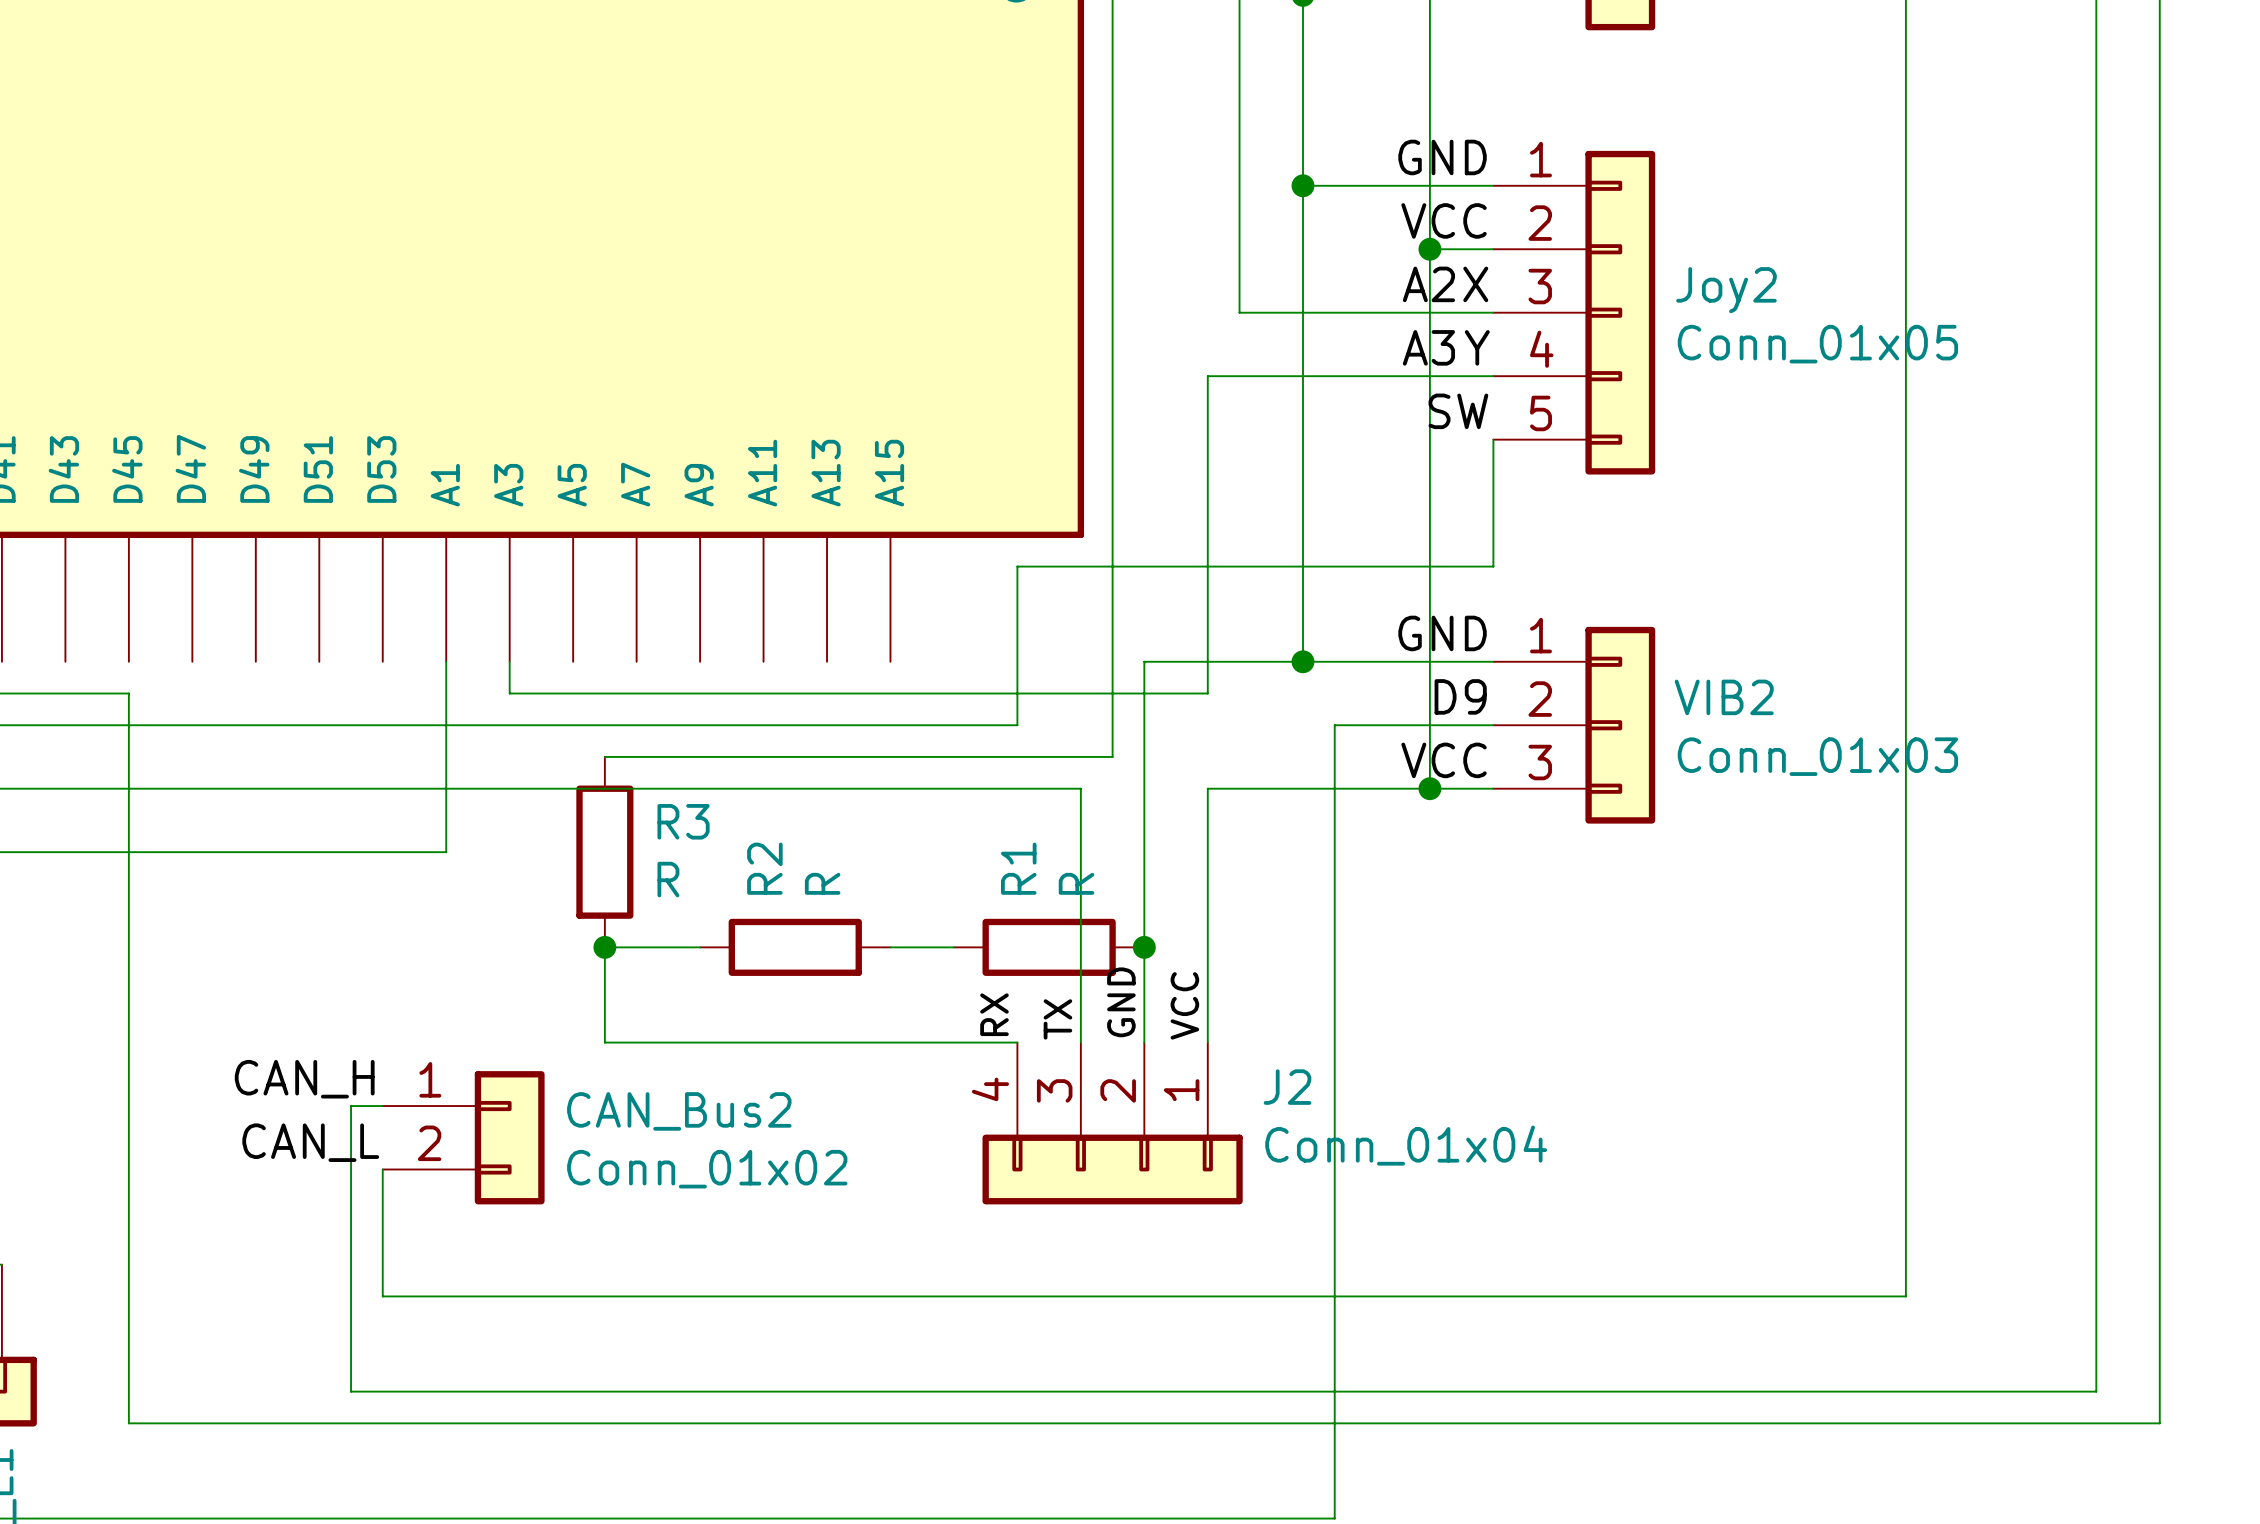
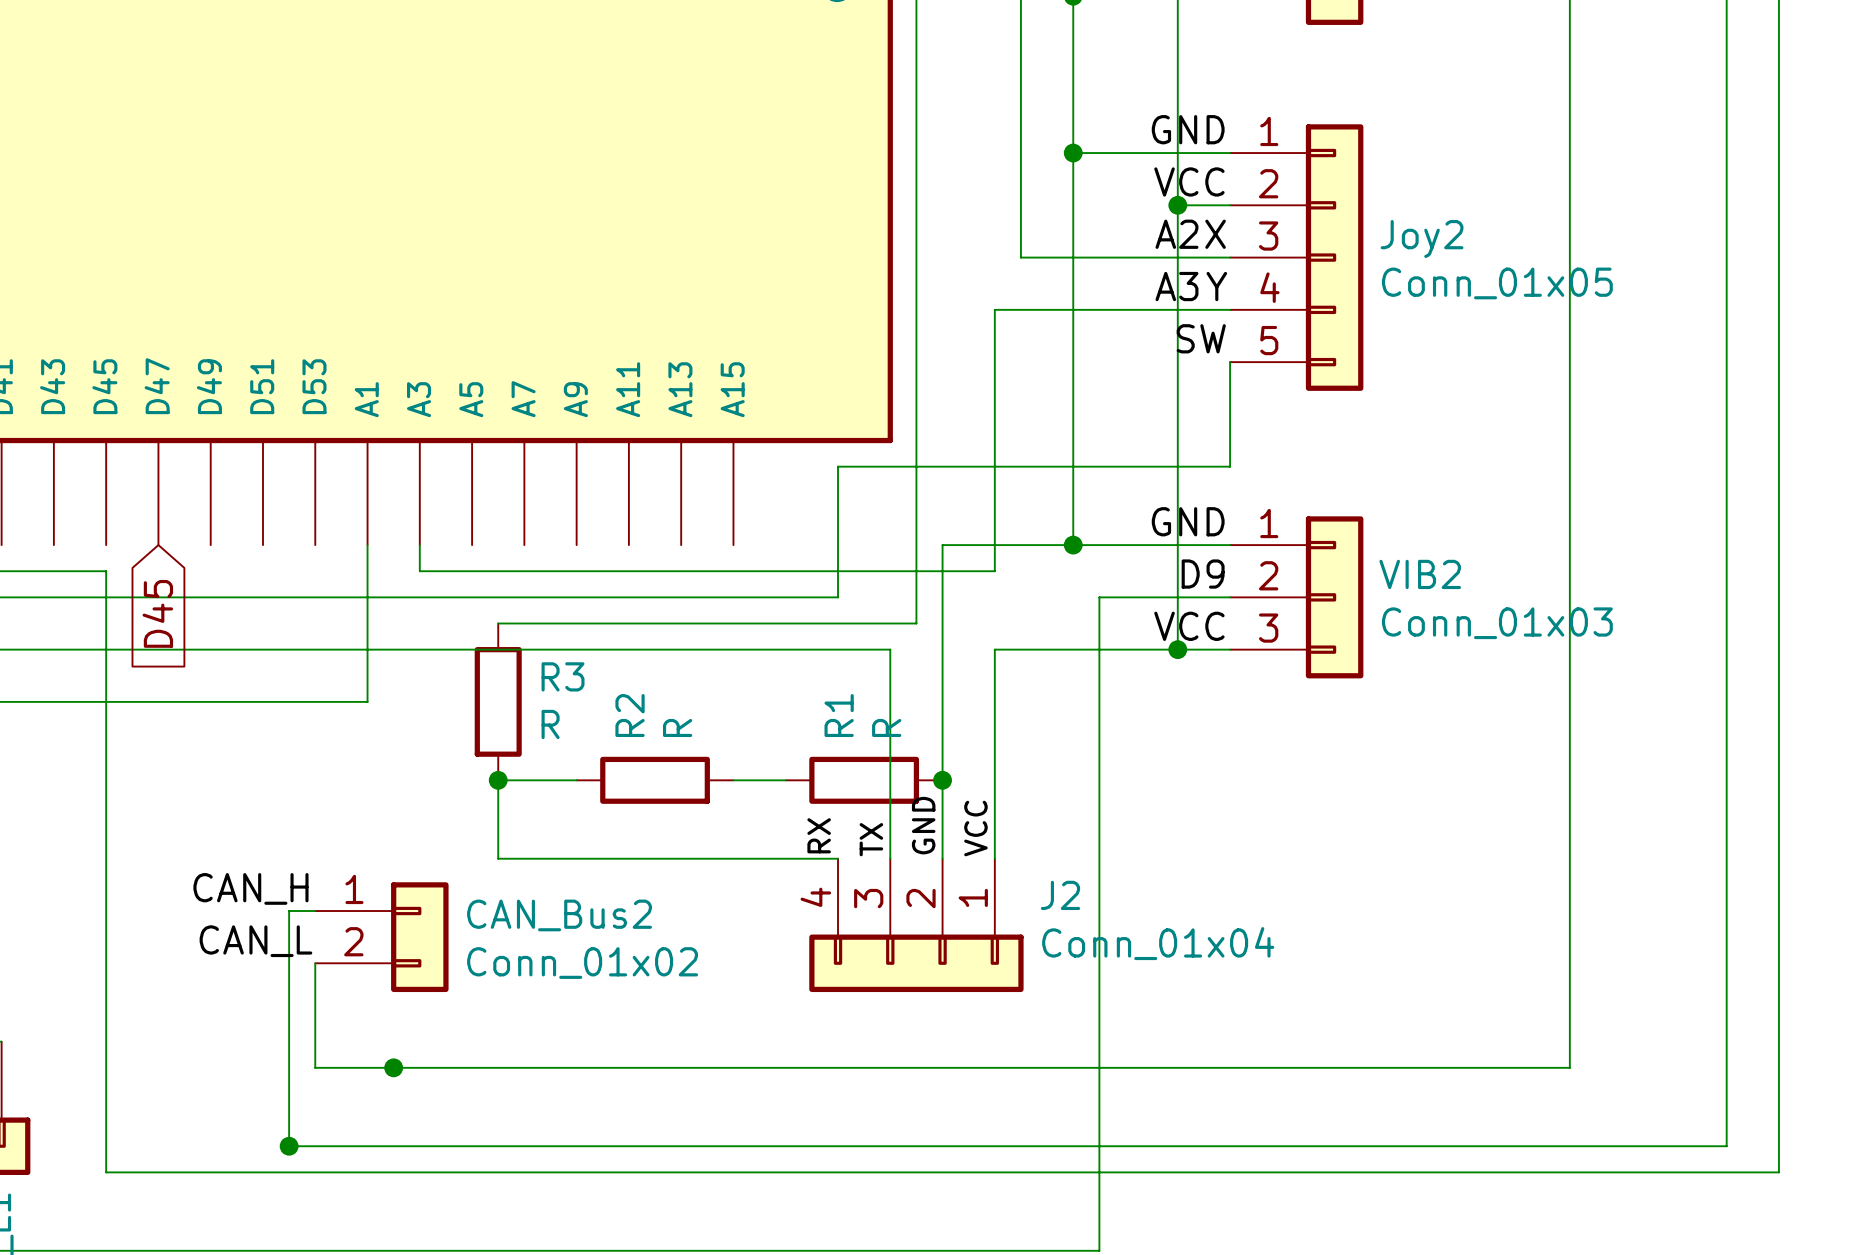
global label: none -> D45 (157, 613)
junction: none -> (393, 1067)
junction: none -> (289, 1146)

